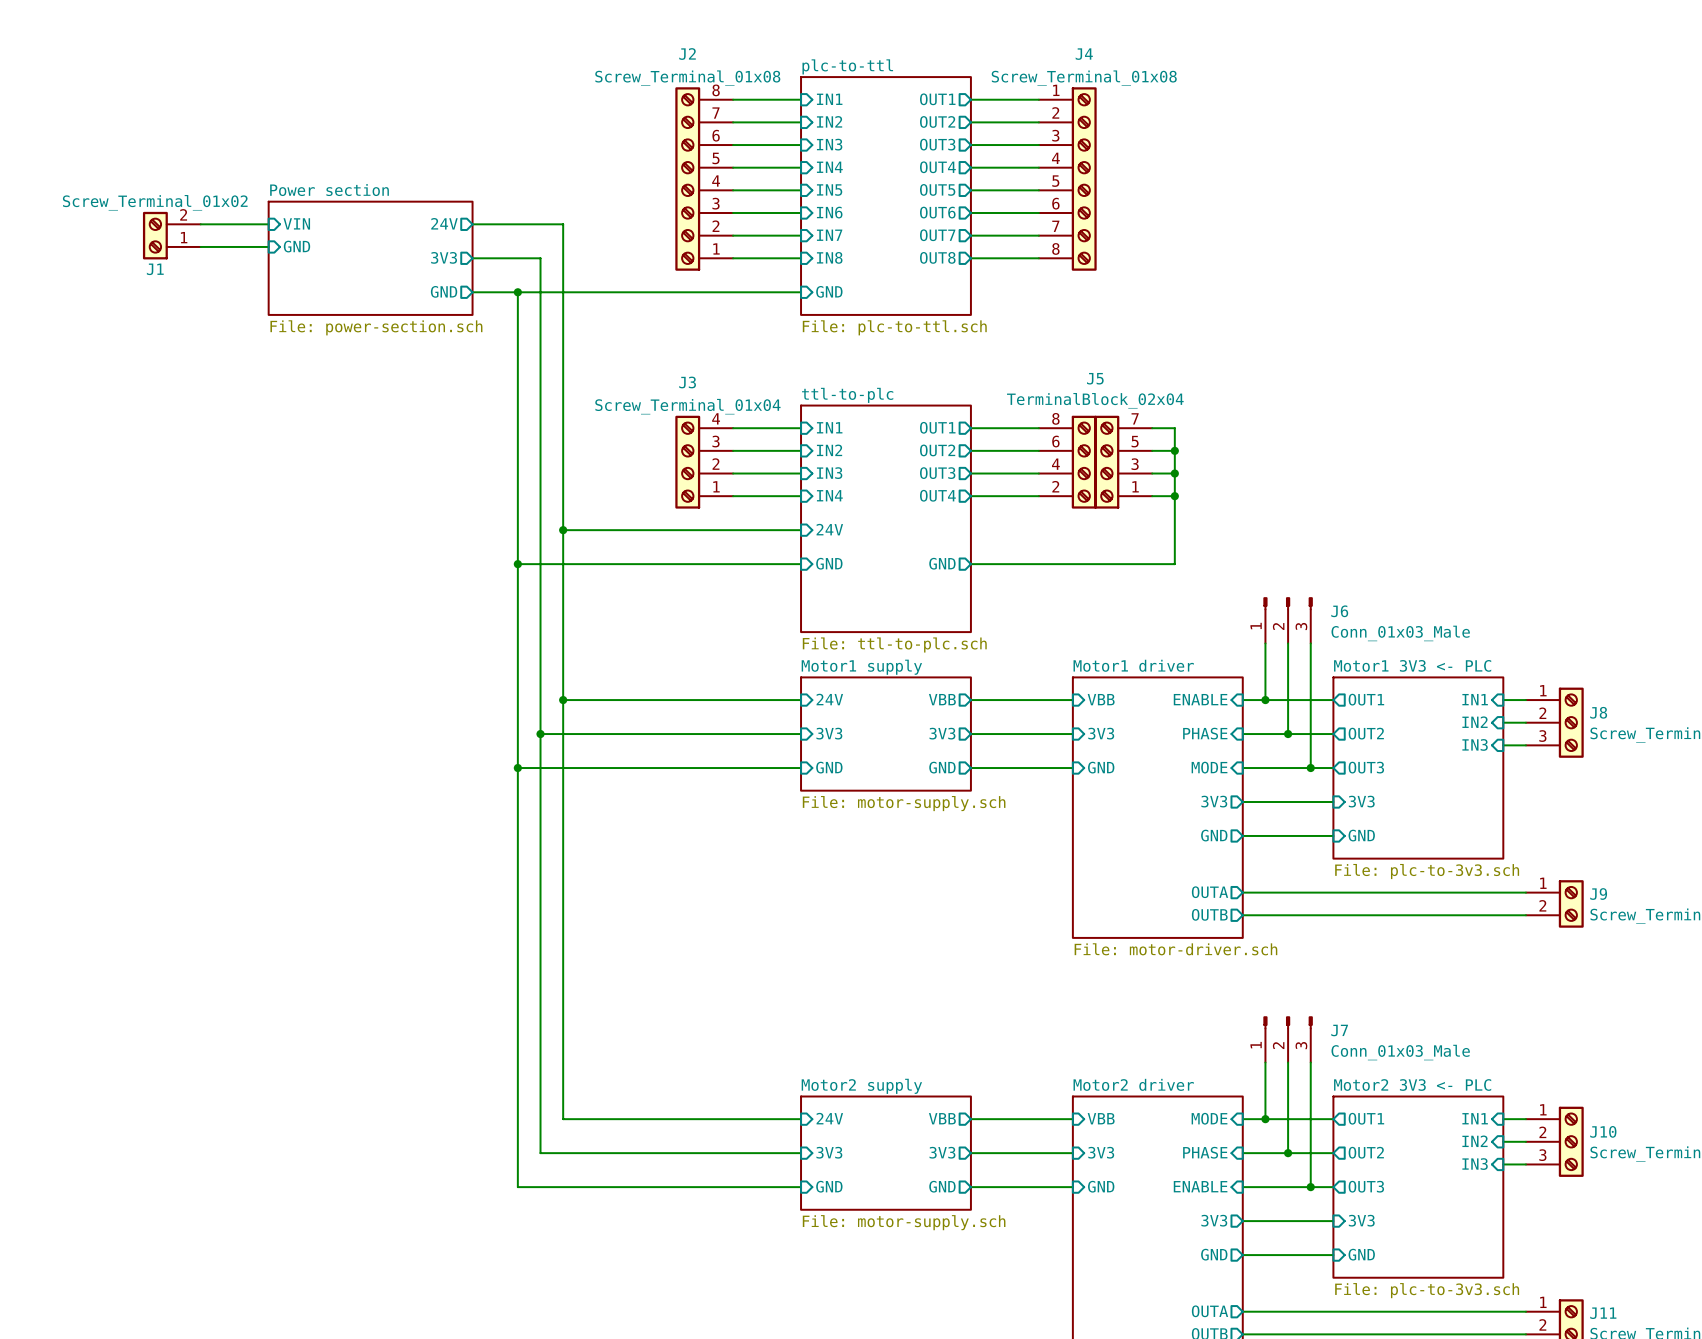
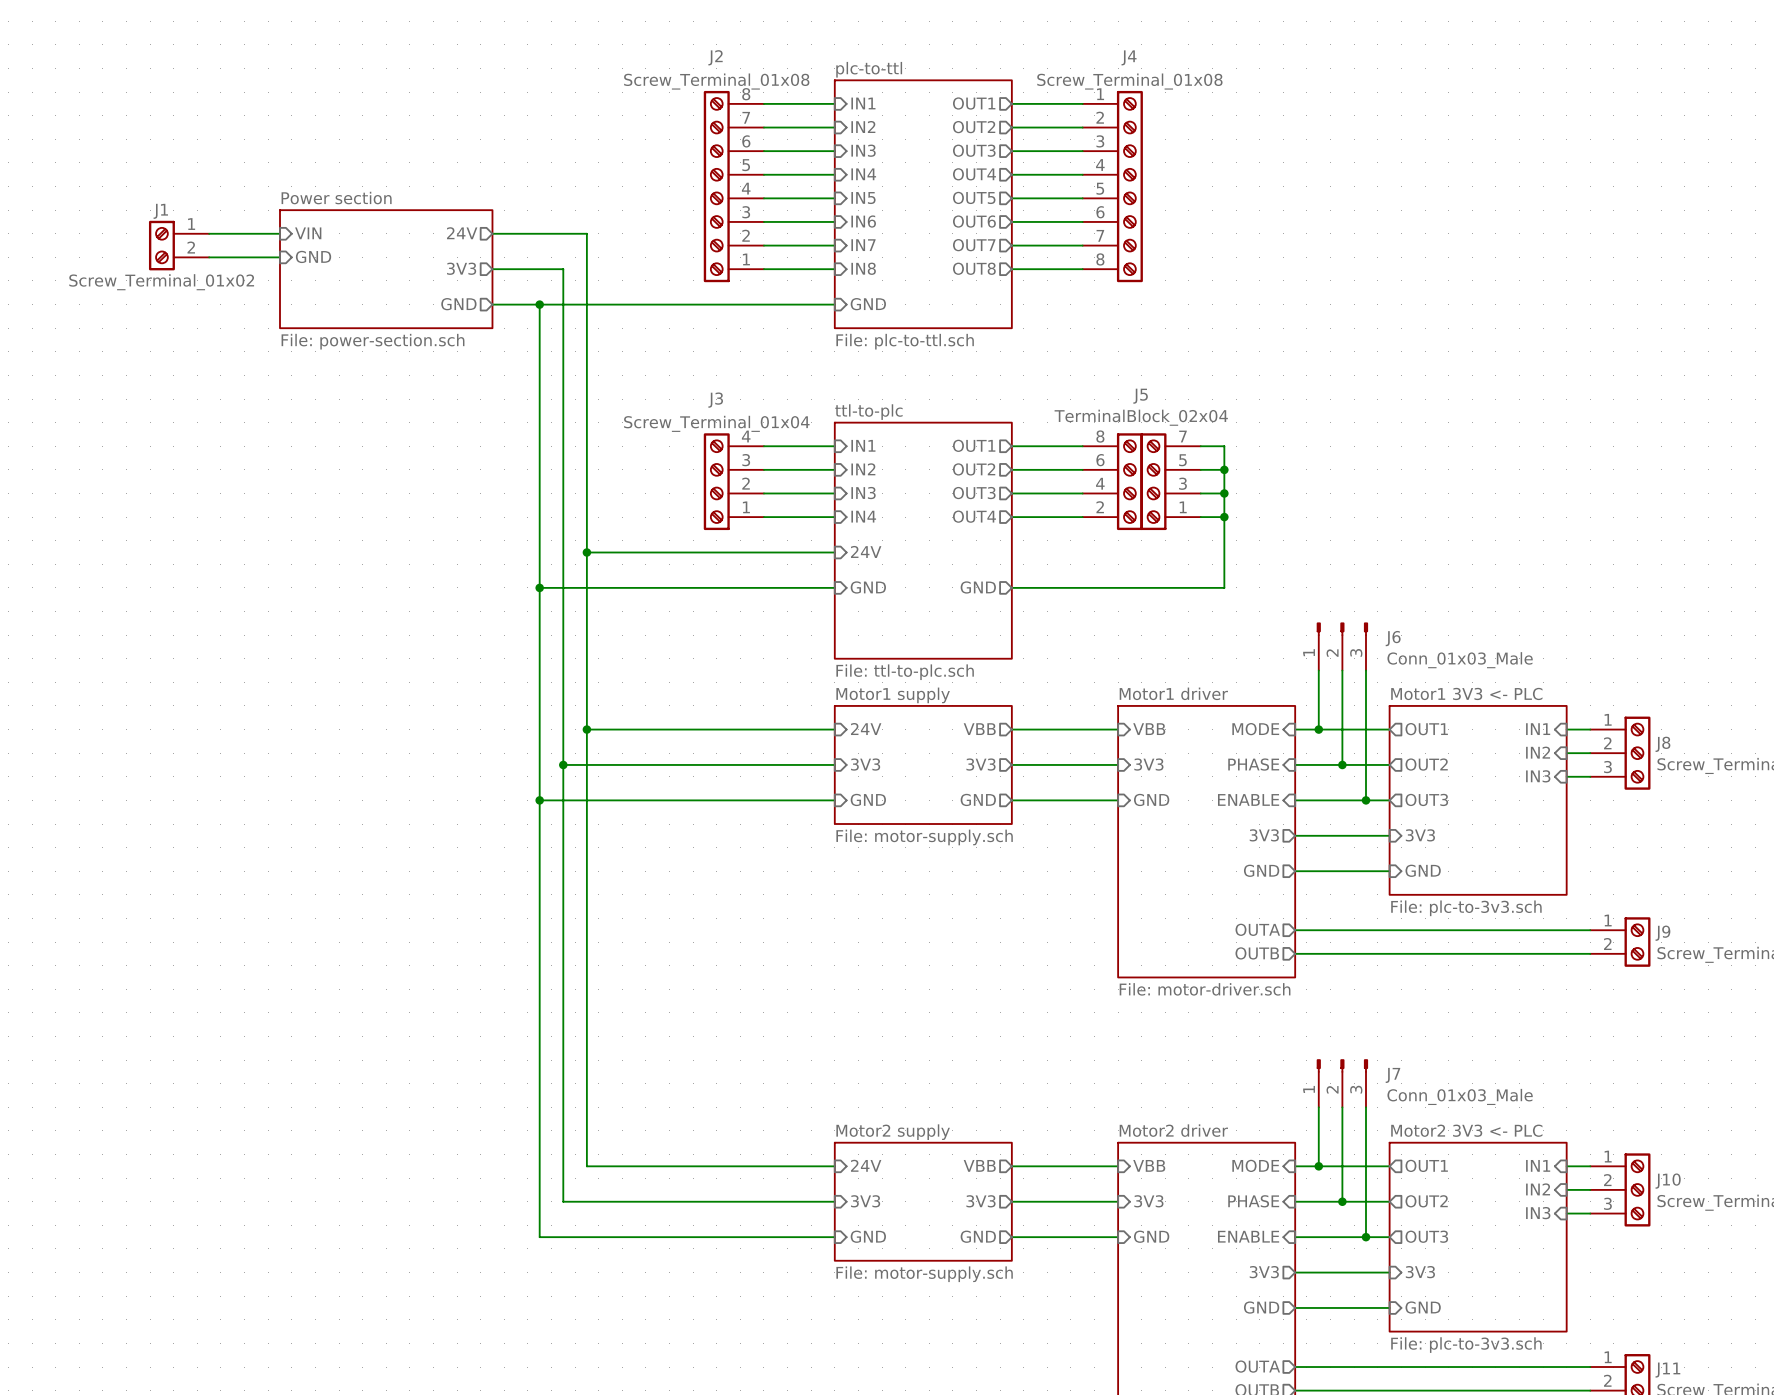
J1 flip: as is (155, 235) -> up-down (161, 245)
sheet pin: ENABLE (1200, 699) -> MODE (1255, 729)
sheet pin: MODE (1209, 767) -> ENABLE (1248, 799)

